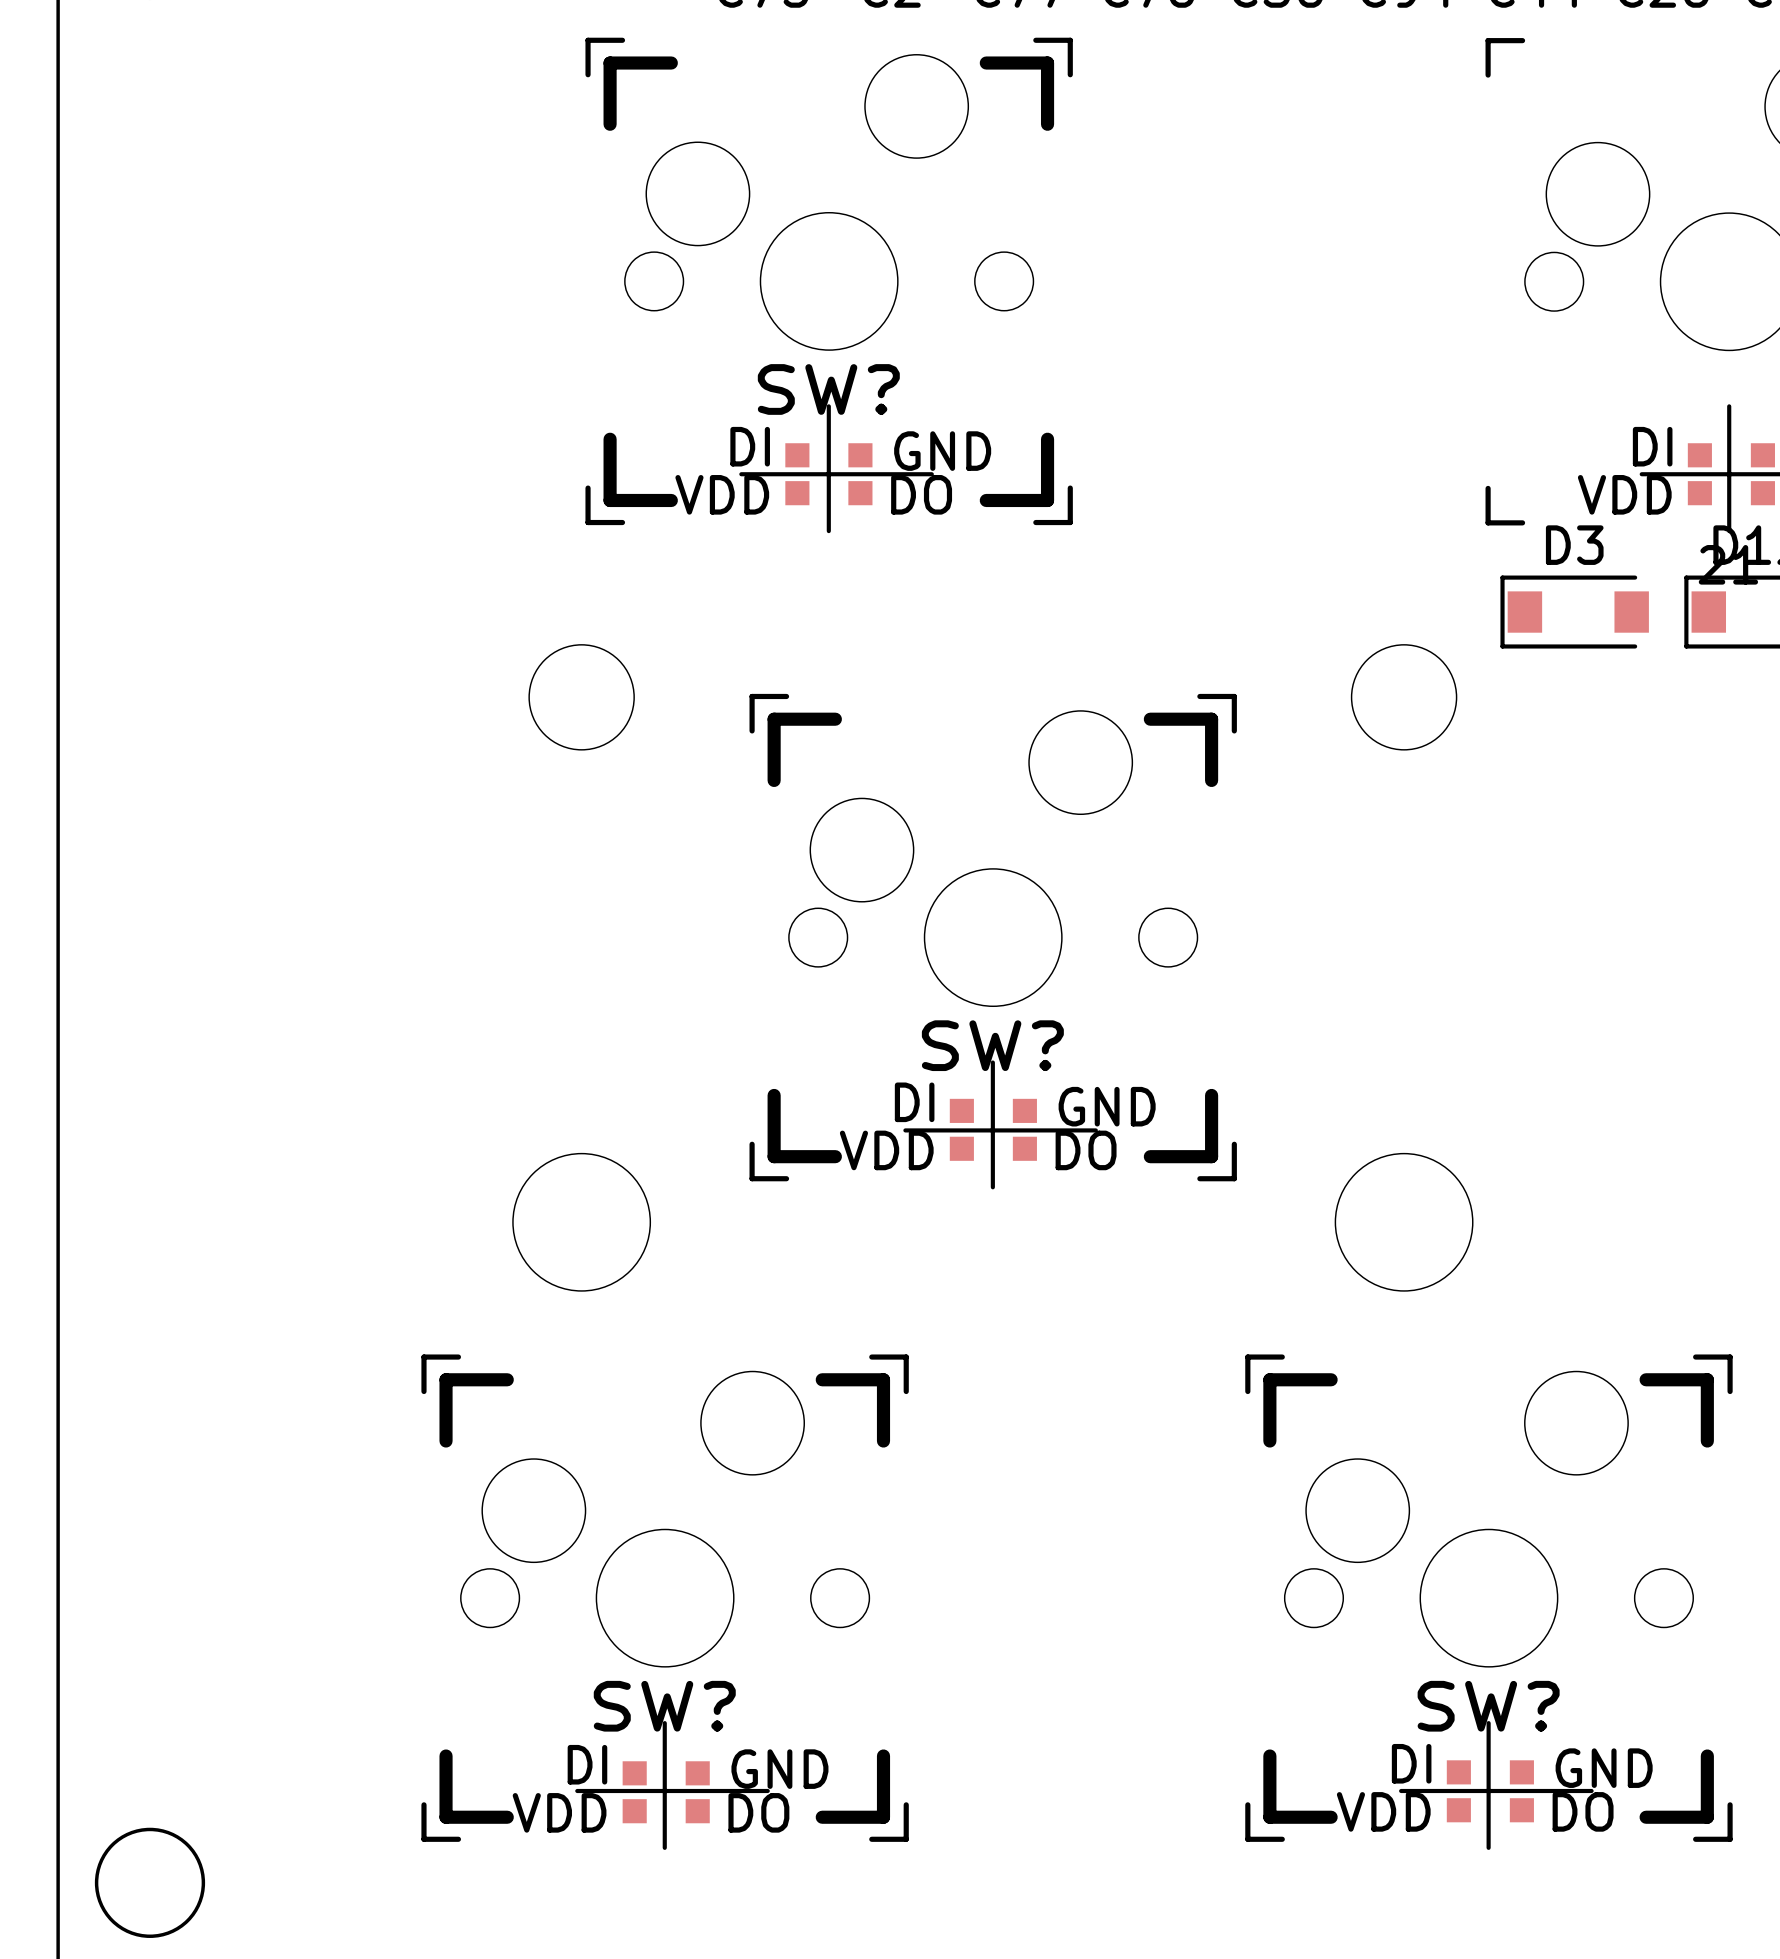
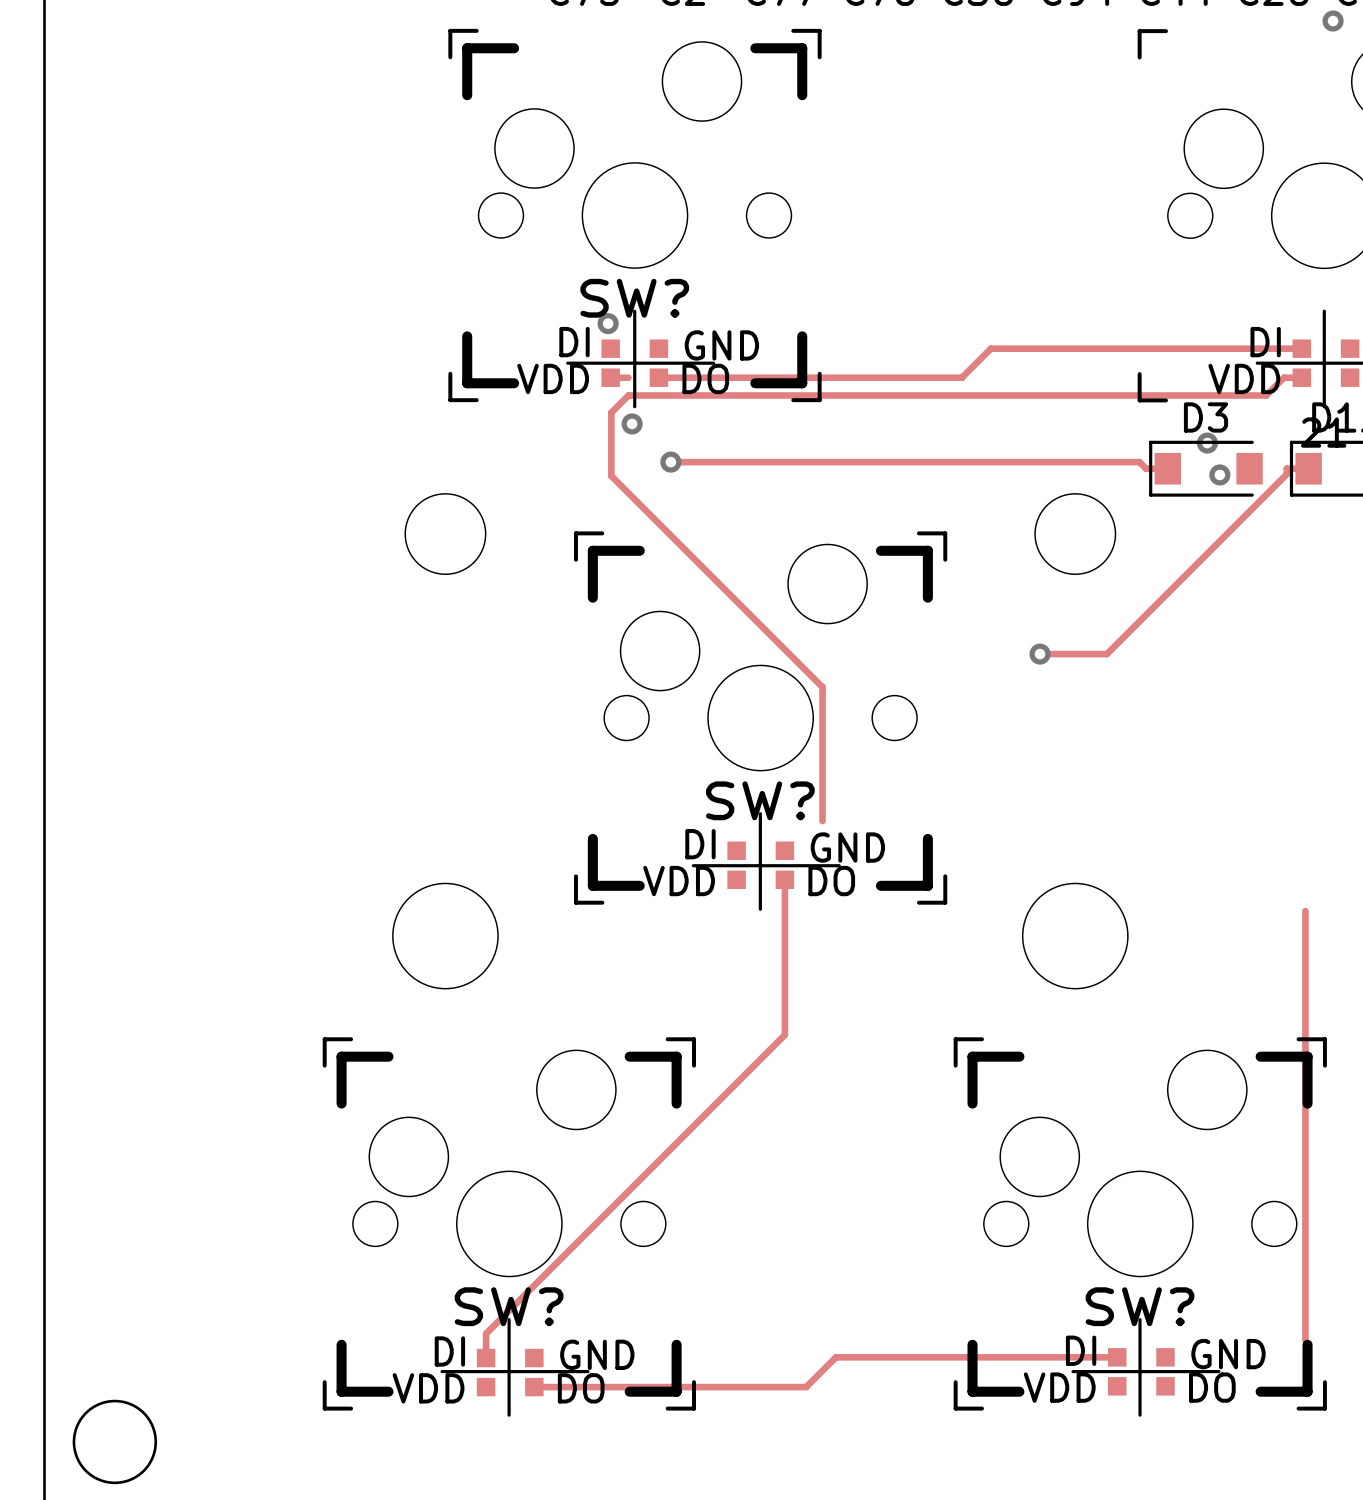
via: none -> (1333, 21)
via: none -> (608, 323)
track: none -> (1301, 348) (990, 348) (961, 377) (658, 377)
track: none -> (610, 377) (628, 377)
track: none -> (1301, 377) (1284, 377) (1266, 395) (628, 395) (611, 412) (611, 476) (822, 687) (822, 821)
via: none -> (632, 423)
via: none -> (1207, 443)
track: none -> (670, 462) (1139, 462) (1146, 468) (1167, 468)
via: none -> (670, 462)
track: none -> (1308, 468) (1286, 468) (1286, 474) (1106, 654) (1040, 654)
via: none -> (1219, 474)
via: none -> (1040, 654)
track: none -> (784, 879) (784, 1034) (486, 1333) (486, 1358)
track: none -> (1305, 911) (1305, 1340)
track: none -> (1117, 1357) (835, 1357) (806, 1387) (534, 1387)

